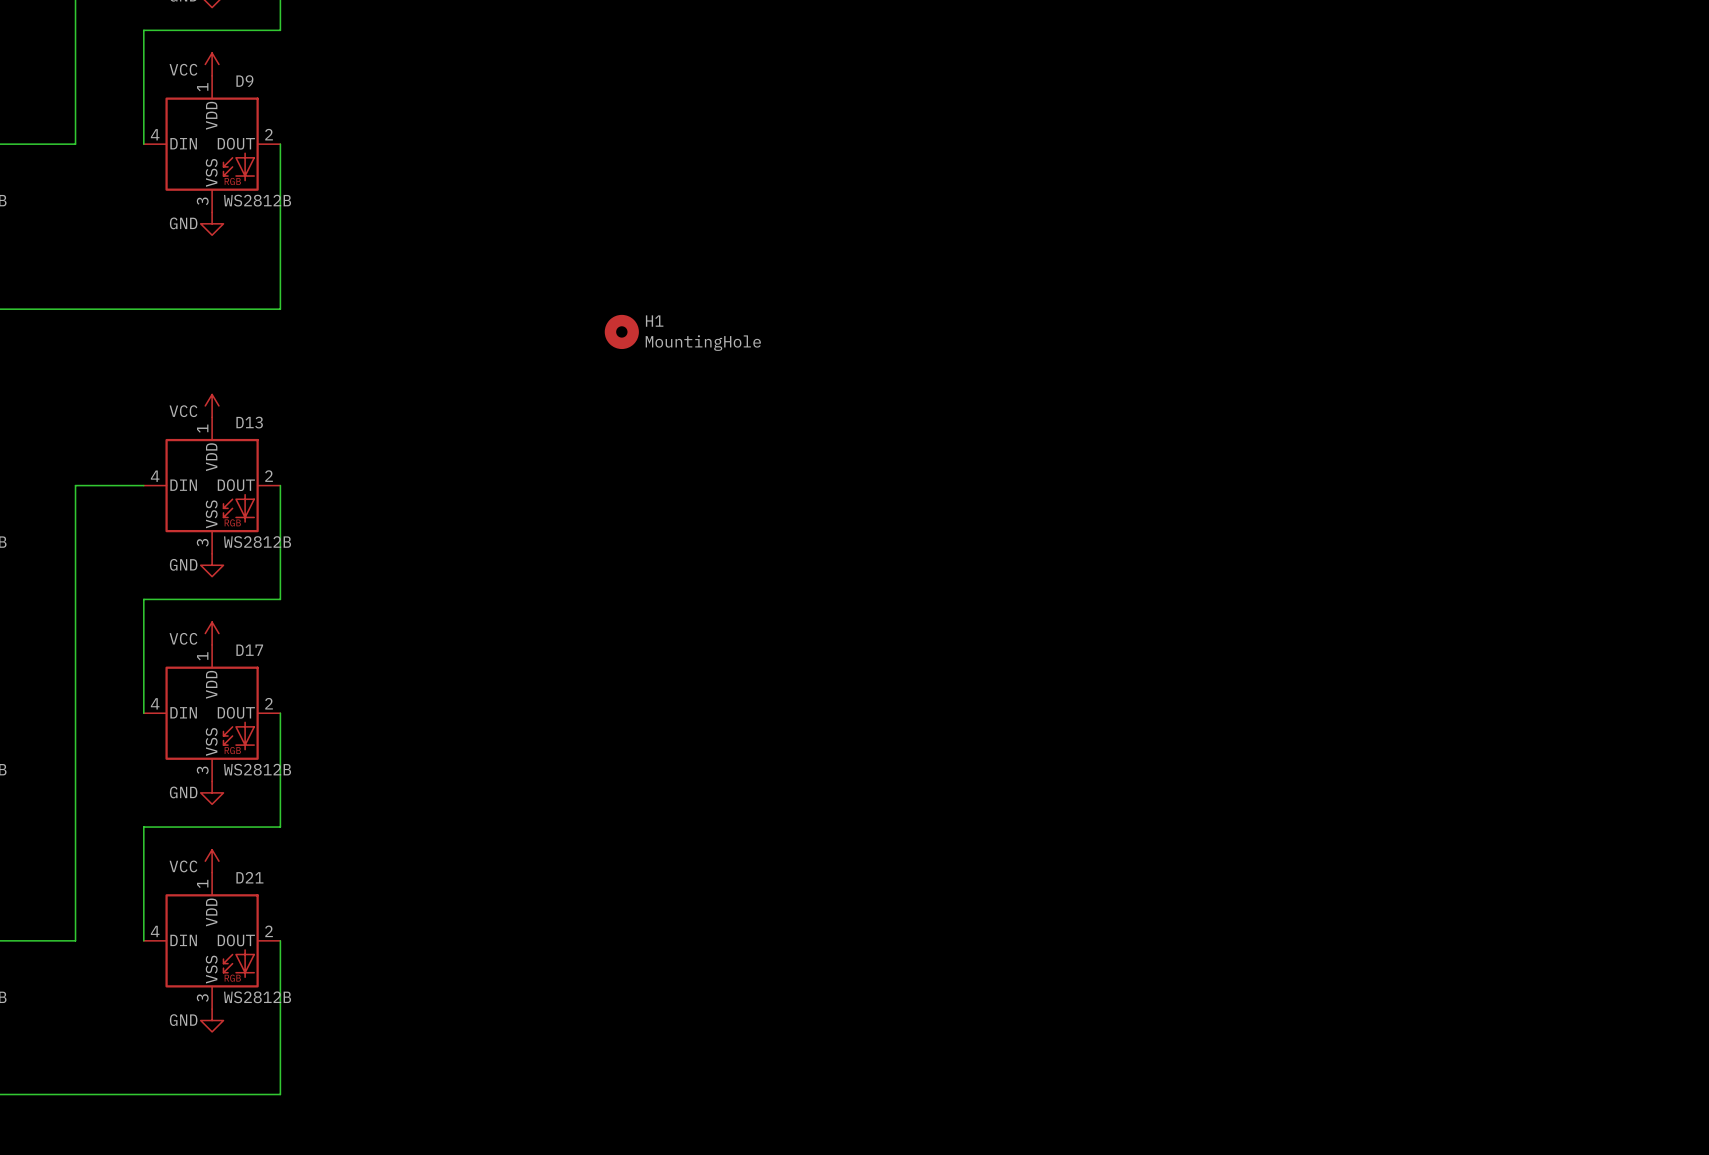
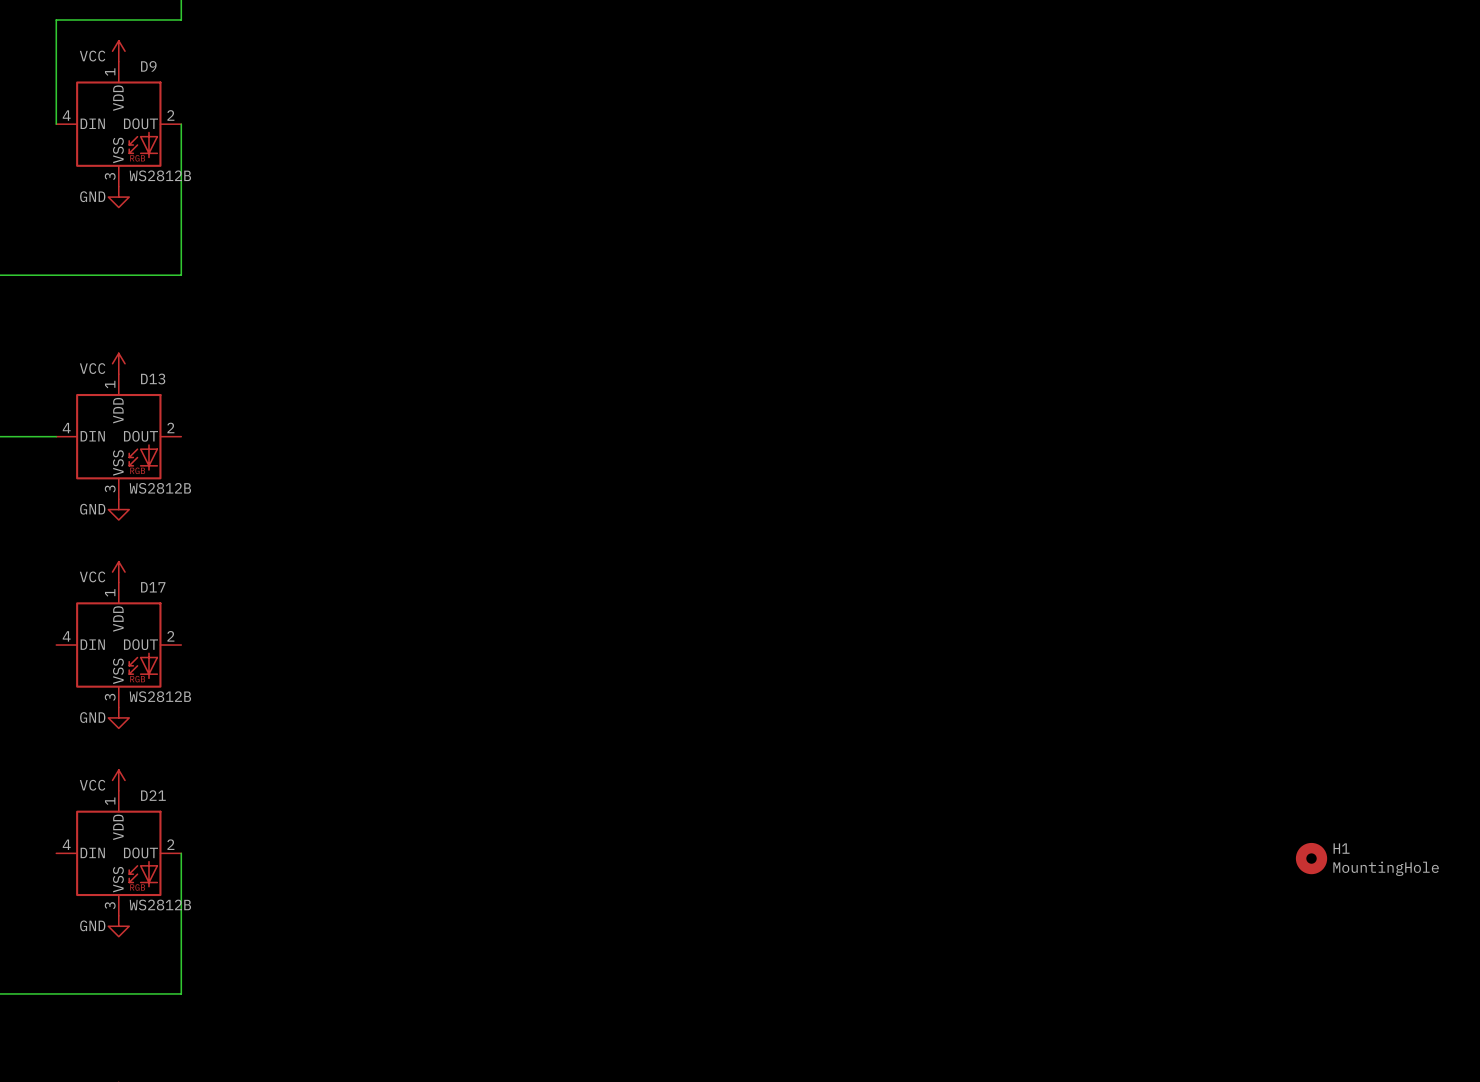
H1 position: (621, 331) -> (1311, 858)
wire: (280, 485) (280, 599) (143, 599) (143, 713) -> none
wire: (280, 713) (280, 827) (143, 827) (143, 940) -> none

